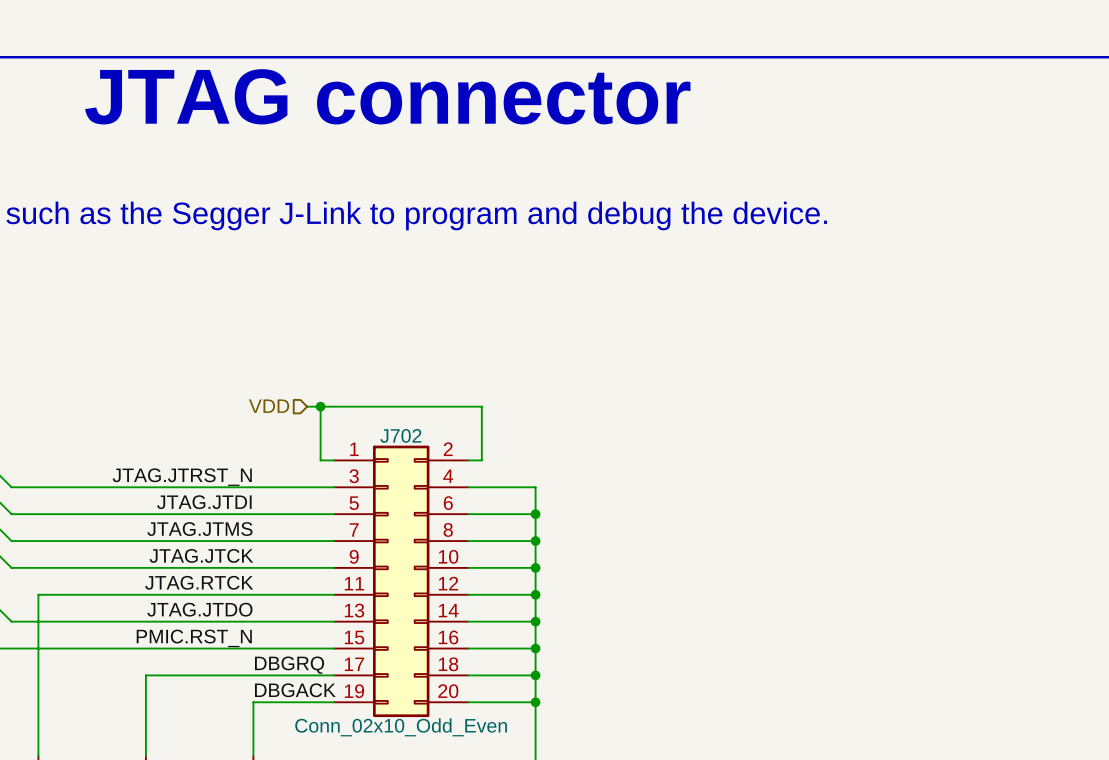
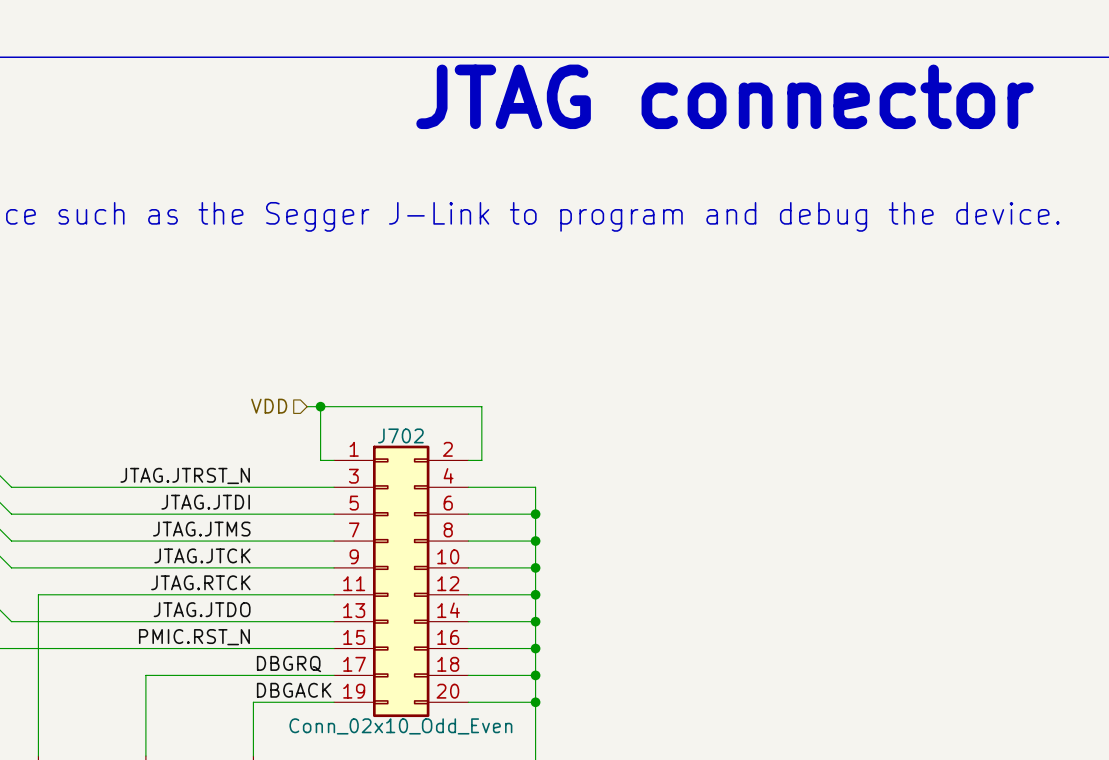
text: JTAG connector (387, 96) -> none
text: none -> JTAG connector (724, 96)

